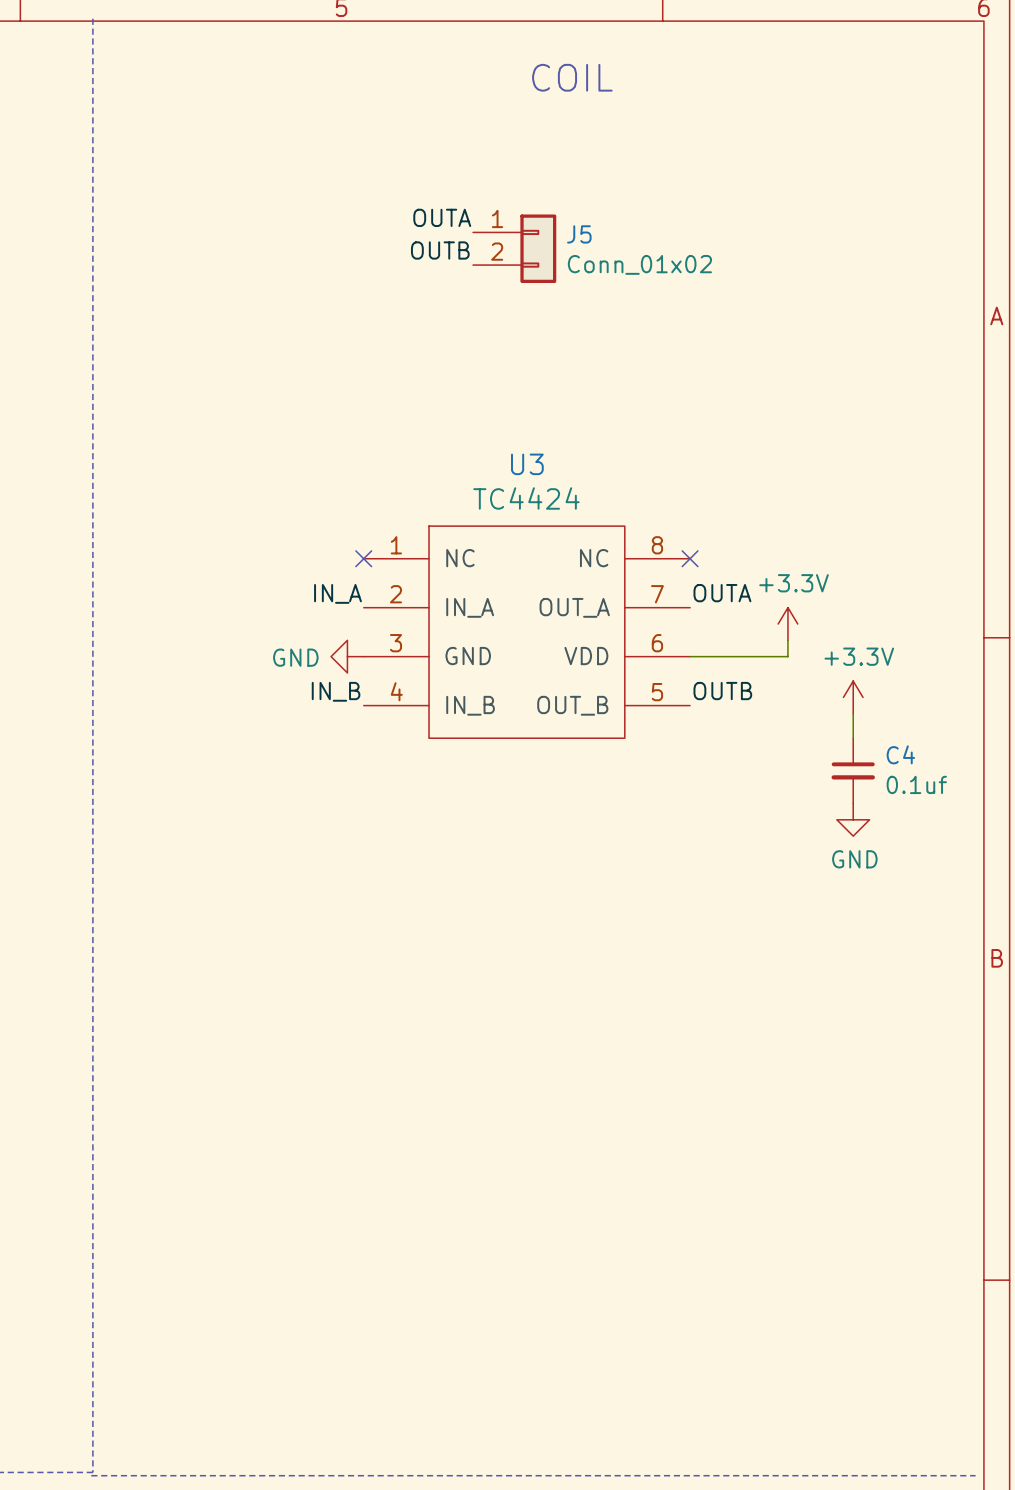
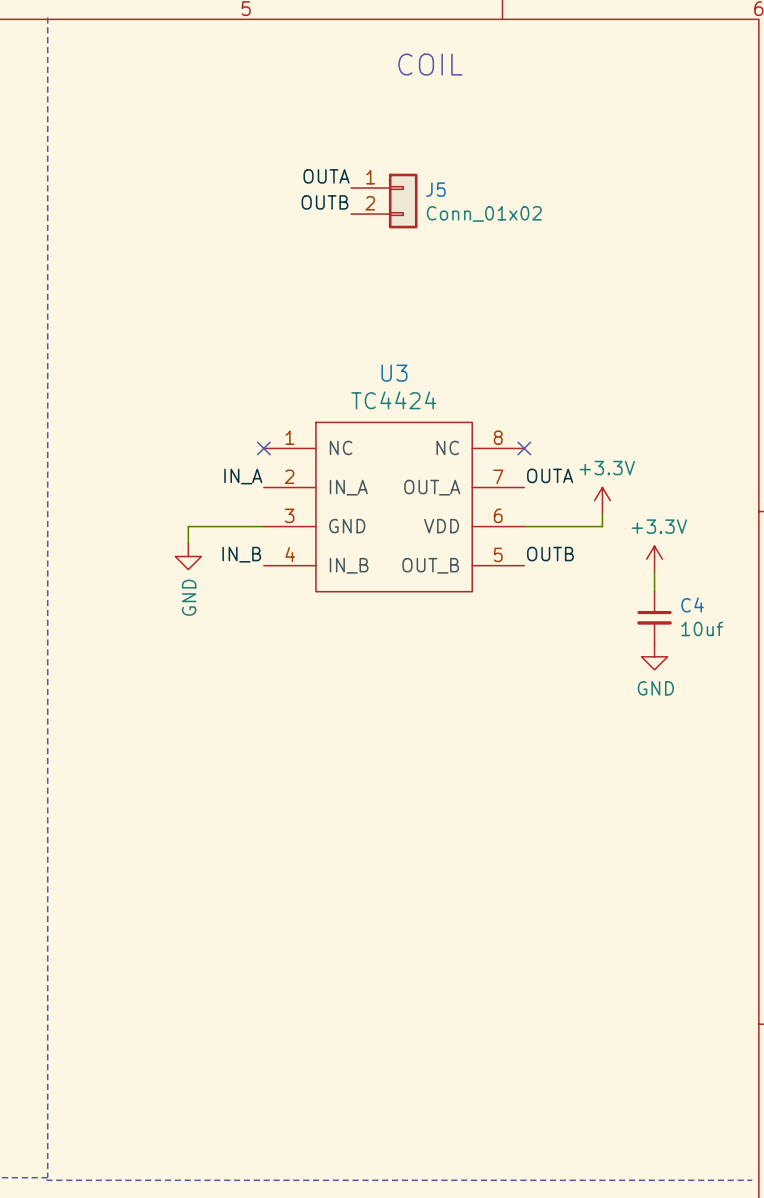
power symbol rotation: 0° (347, 656) -> 90° counterclockwise (188, 556)
power symbol position: GND (347, 656) -> GND (188, 556)
wire: none -> (263, 526) (188, 526) (188, 543)
C4 value: 0.1uf (916, 784) -> 10uf (702, 628)

